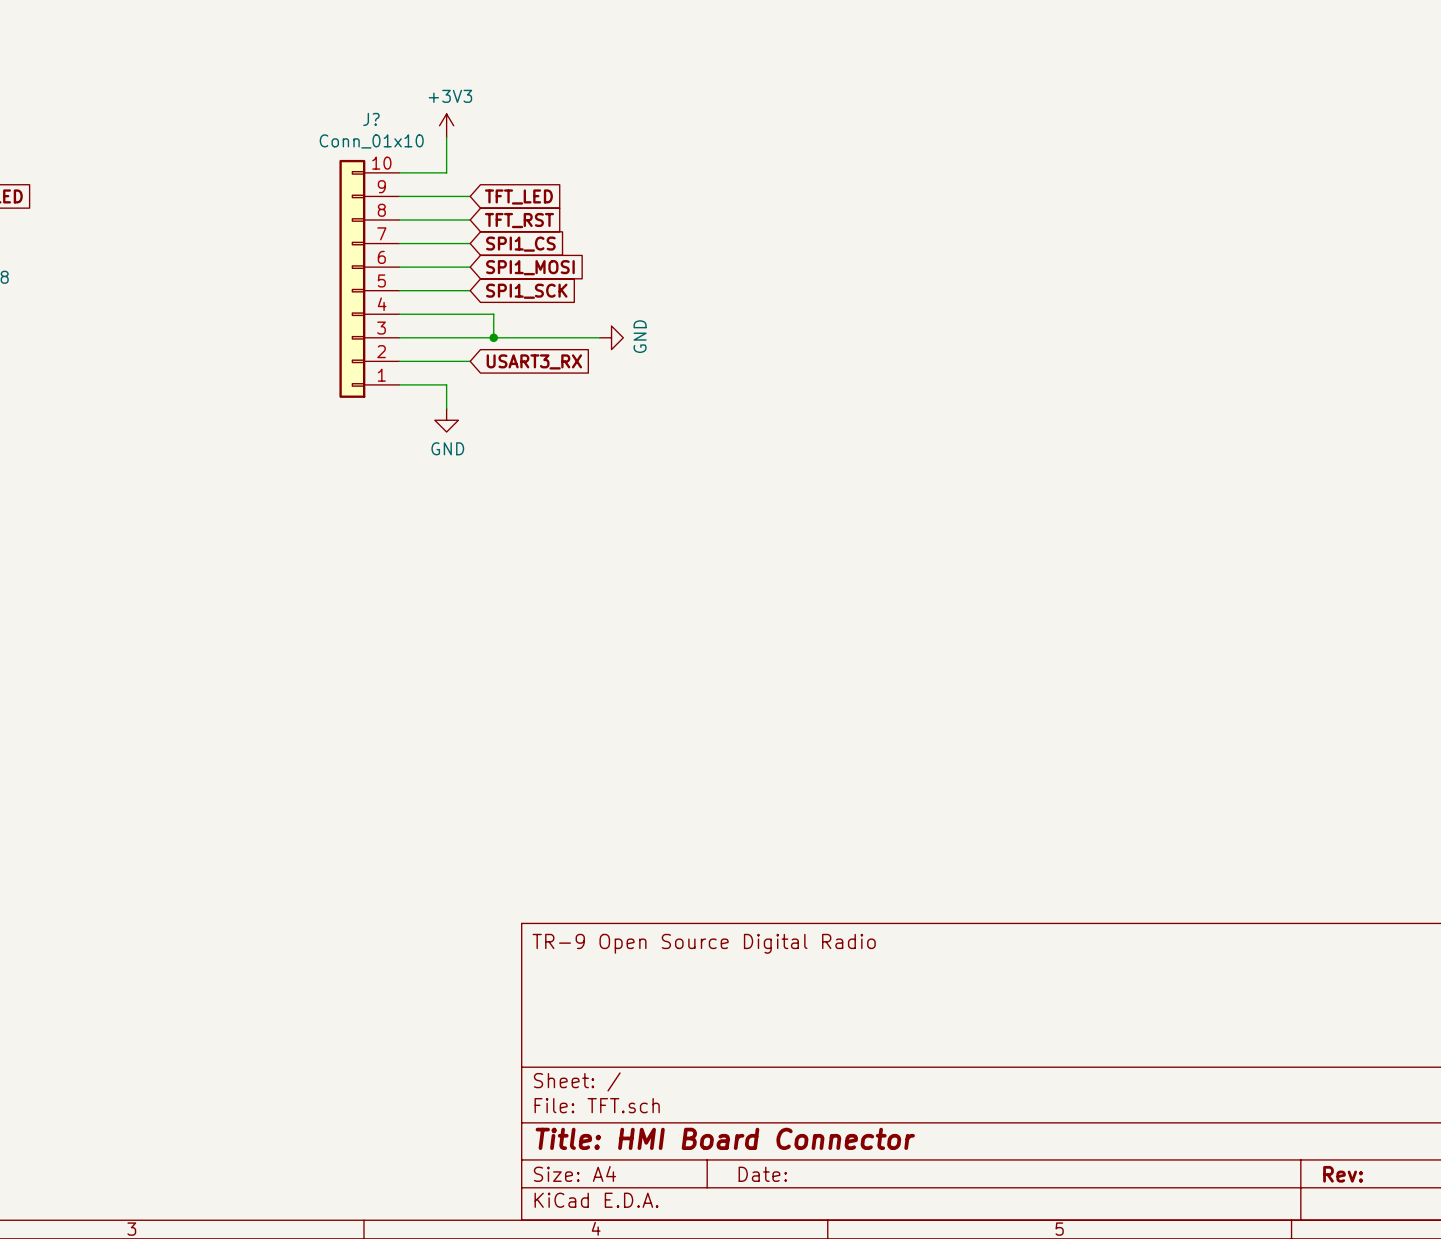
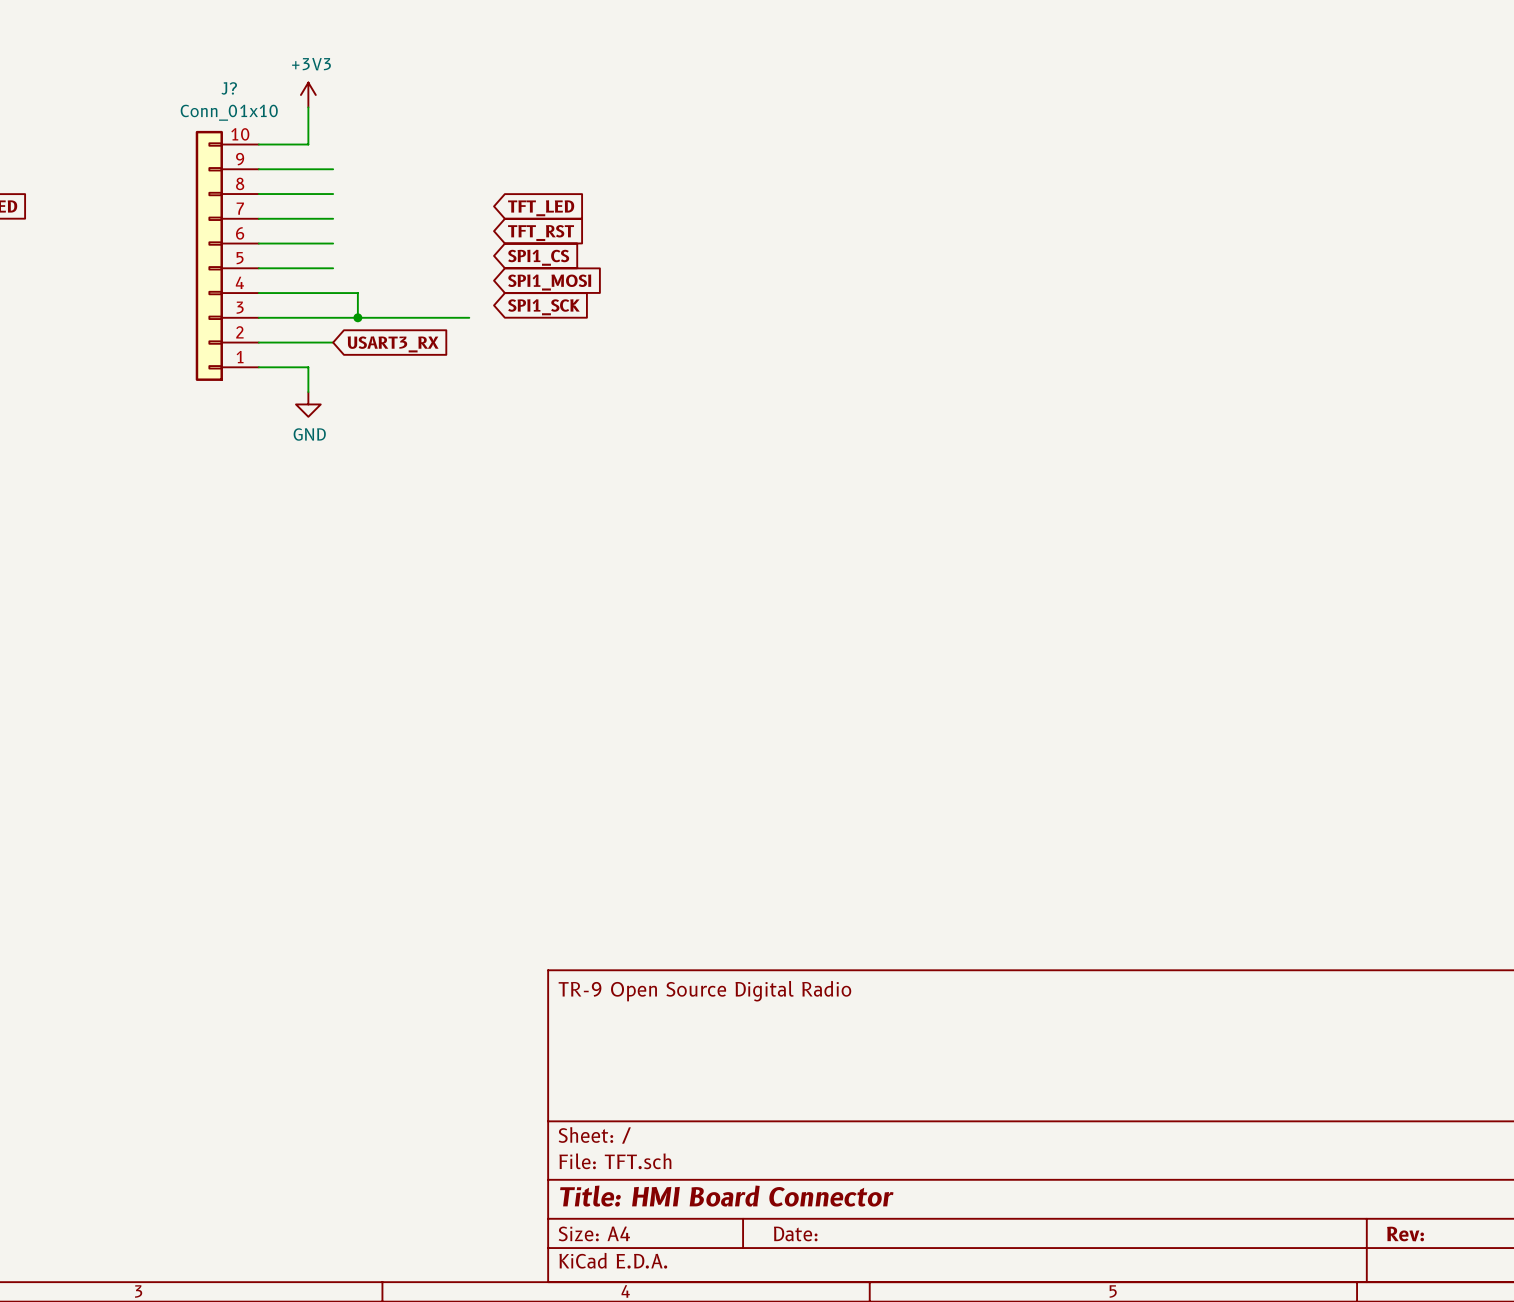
power symbol position: +3V3 (446, 125) -> +3V3 (308, 95)
wire: (446, 137) (446, 172) (399, 172) -> (308, 107) (308, 144) (258, 144)
wire: (399, 196) (470, 196) -> (258, 169) (333, 169)
wire: (399, 219) (470, 219) -> (258, 194) (333, 194)
wire: (399, 243) (470, 243) -> (258, 218) (333, 218)
wire: (399, 267) (470, 267) -> (258, 243) (333, 243)
J? position: (369, 278) -> (227, 255)
wire: (399, 290) (470, 290) -> (258, 268) (333, 268)
junction: none -> (357, 317)
wire: (399, 314) (493, 314) (493, 337) -> (258, 293) (357, 293) (357, 317)
wire: (399, 337) (599, 337) -> (258, 317) (469, 317)
junction: (493, 337) -> none
power symbol: GND (611, 337) -> none
wire: (399, 361) (470, 361) -> (258, 342) (333, 342)
global label position: USART3_RX (534, 361) -> USART3_RX (393, 344)
wire: (399, 384) (446, 384) (446, 408) -> (258, 367) (308, 367) (308, 392)
power symbol position: GND (446, 420) -> GND (308, 404)

